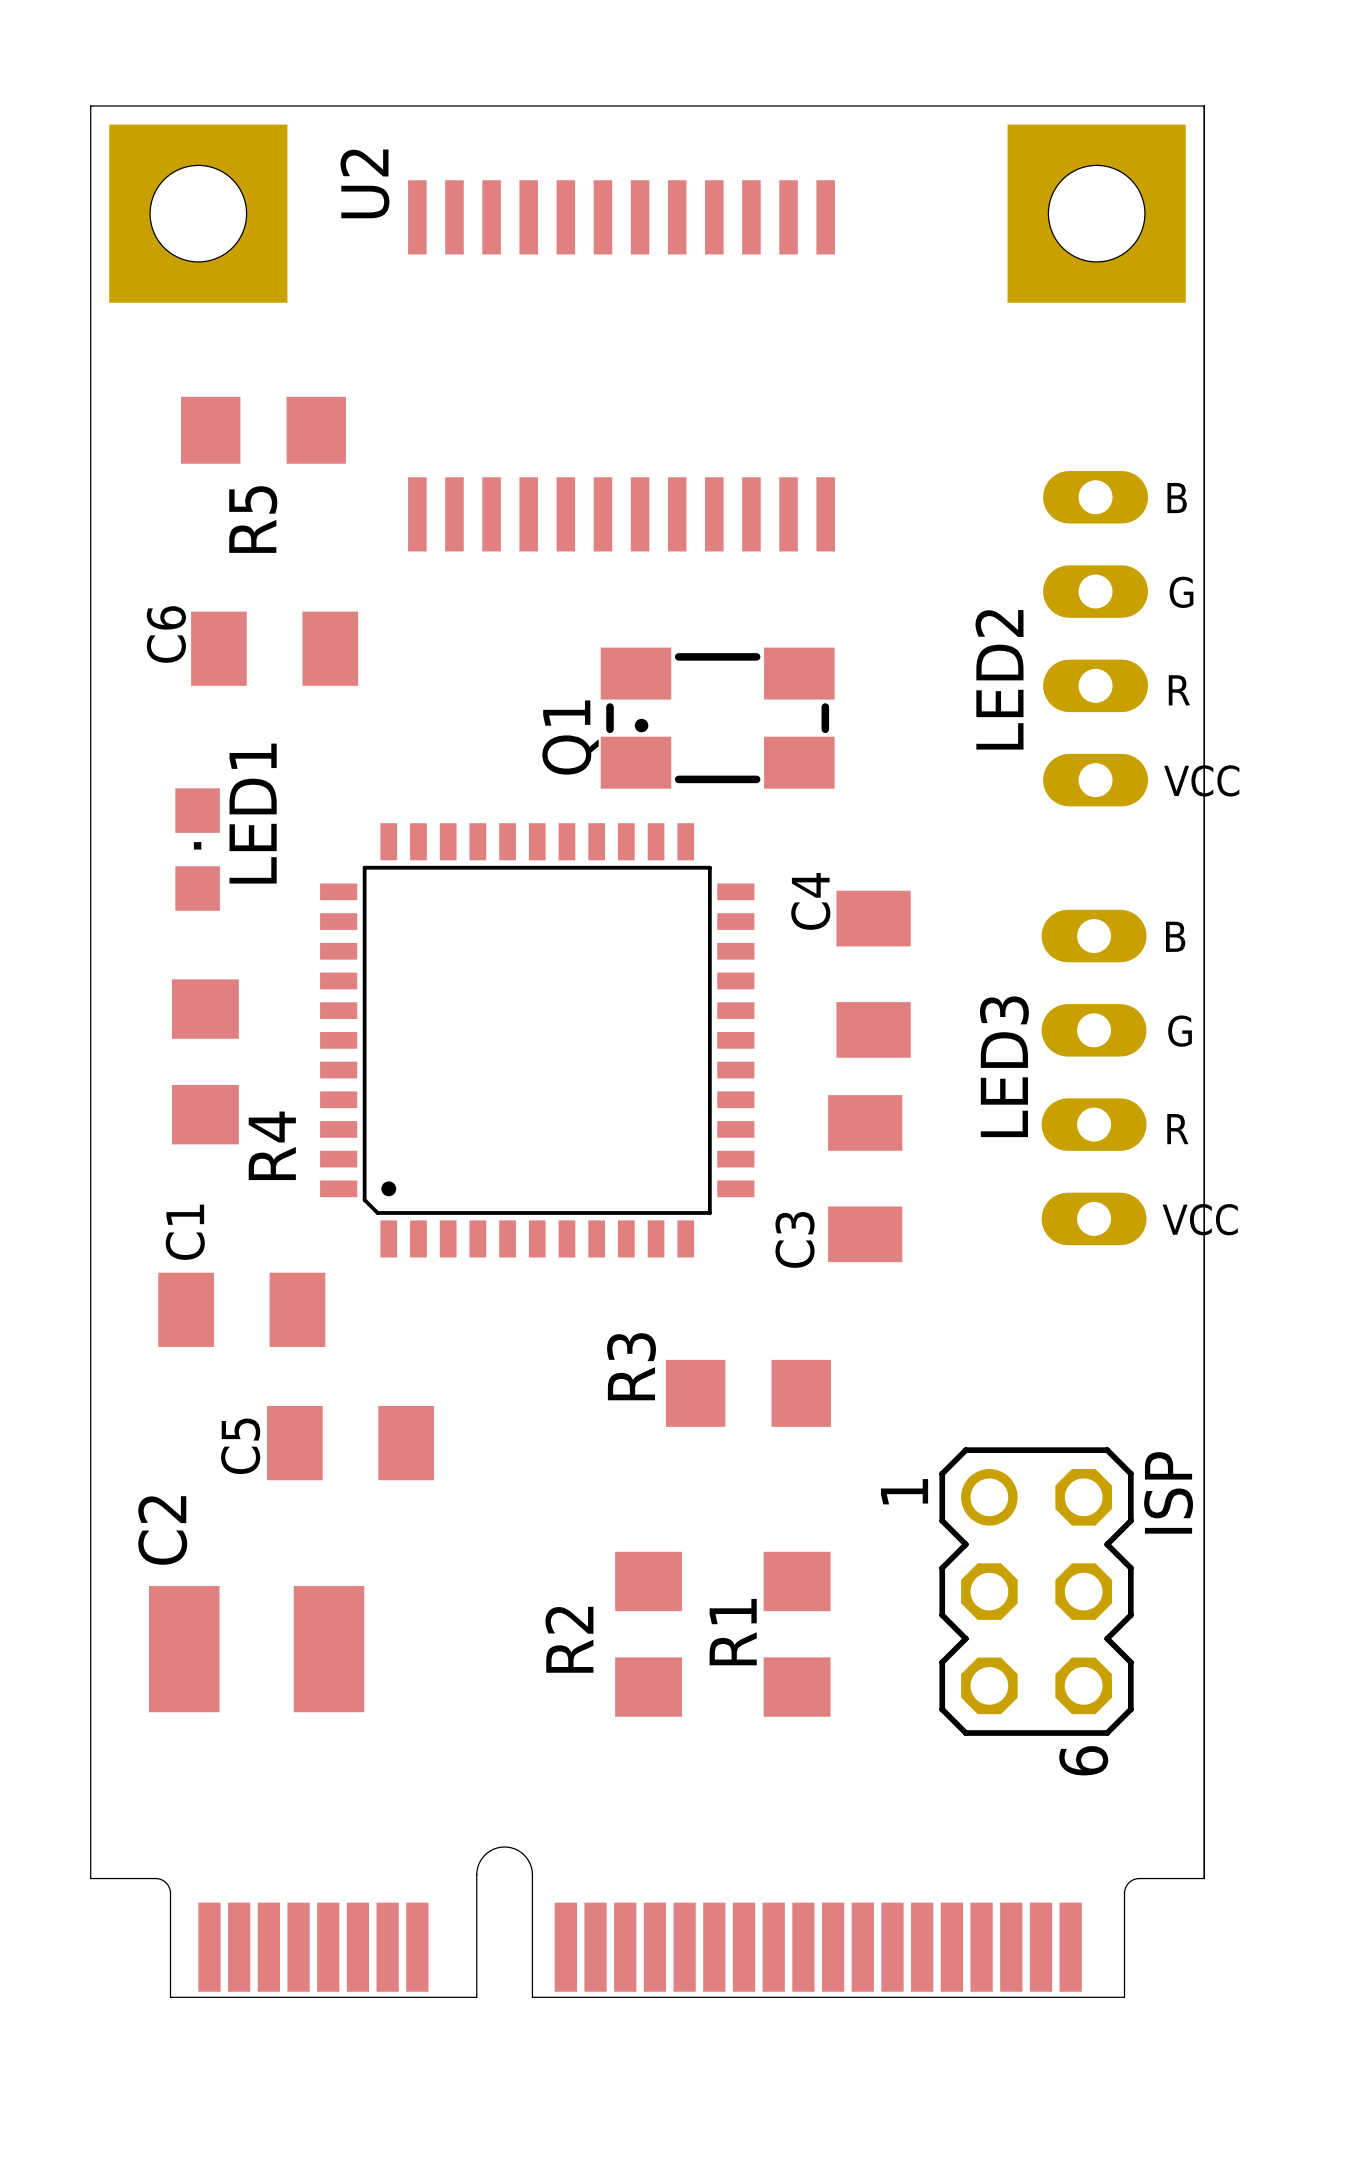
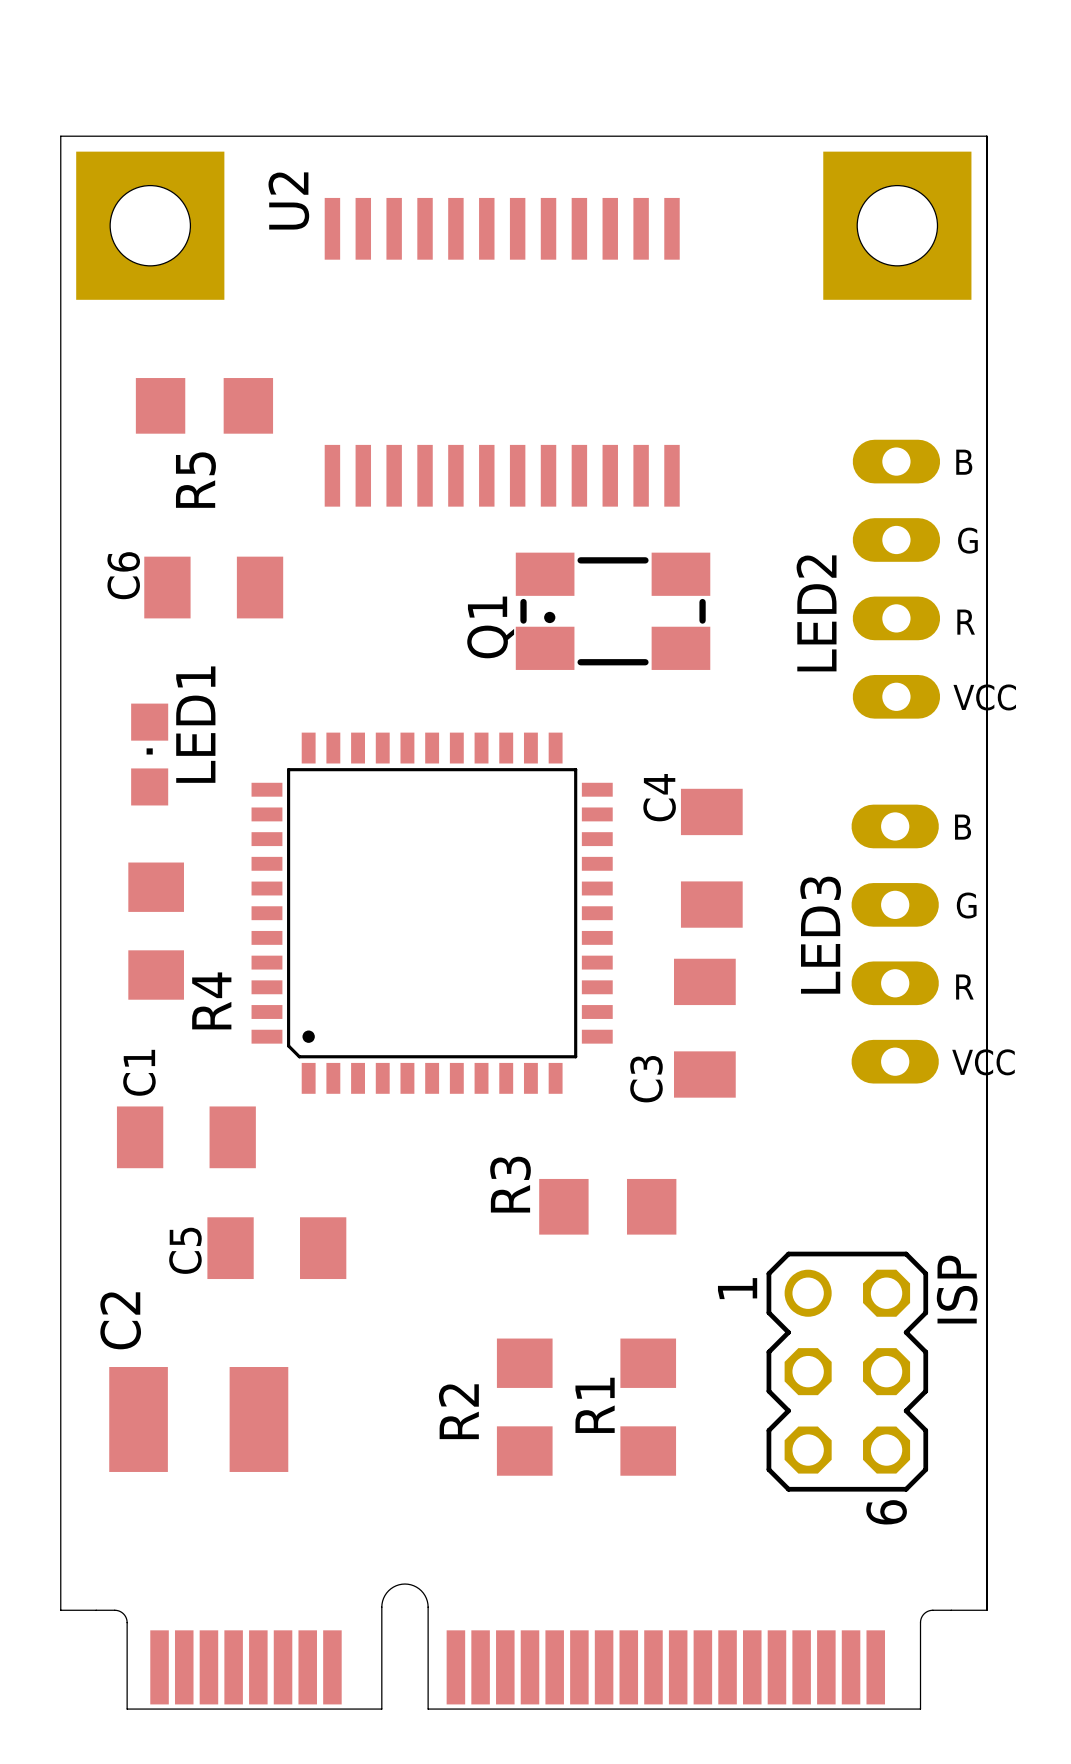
Q1 position: (717, 718) -> (613, 611)

